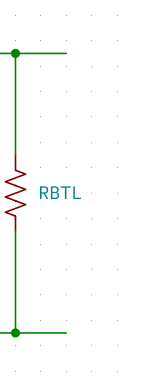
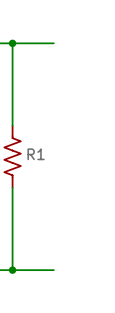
R1 name: none -> R1 (36, 154)
R1 value: RBTL (60, 192) -> none

